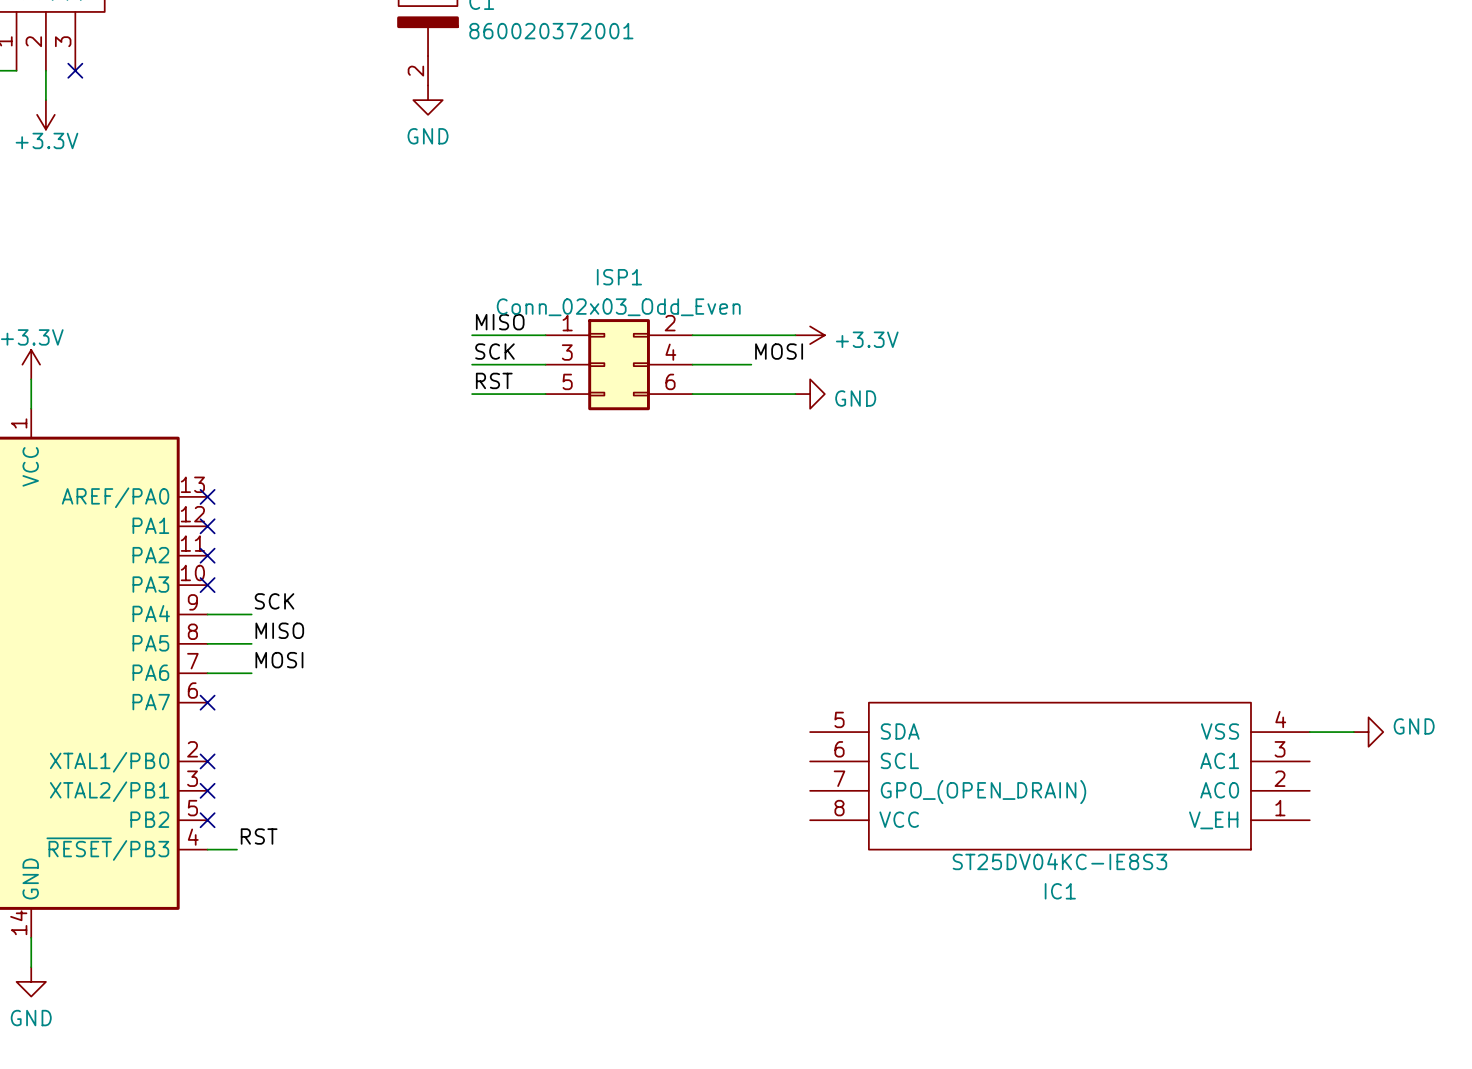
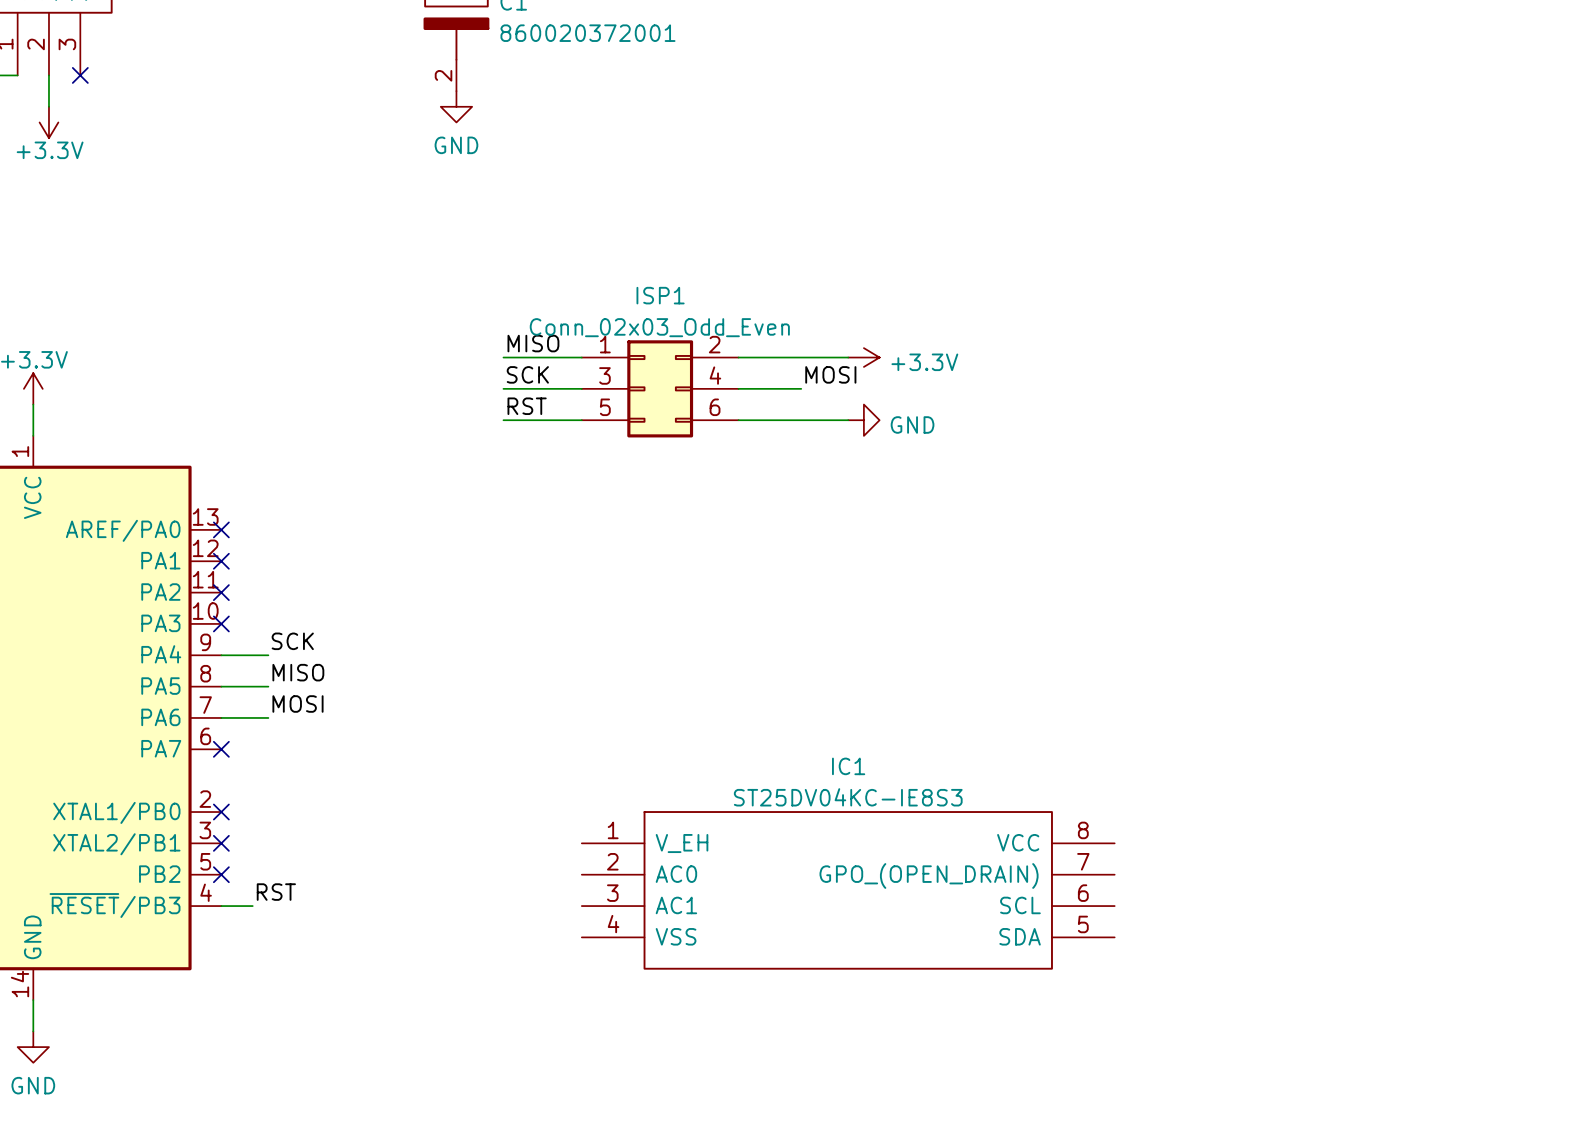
wire: (1309, 732) (1353, 732) -> none
power symbol: GND (1368, 732) -> none
IC1 rotation: 0° (1059, 776) -> 180° (848, 890)

